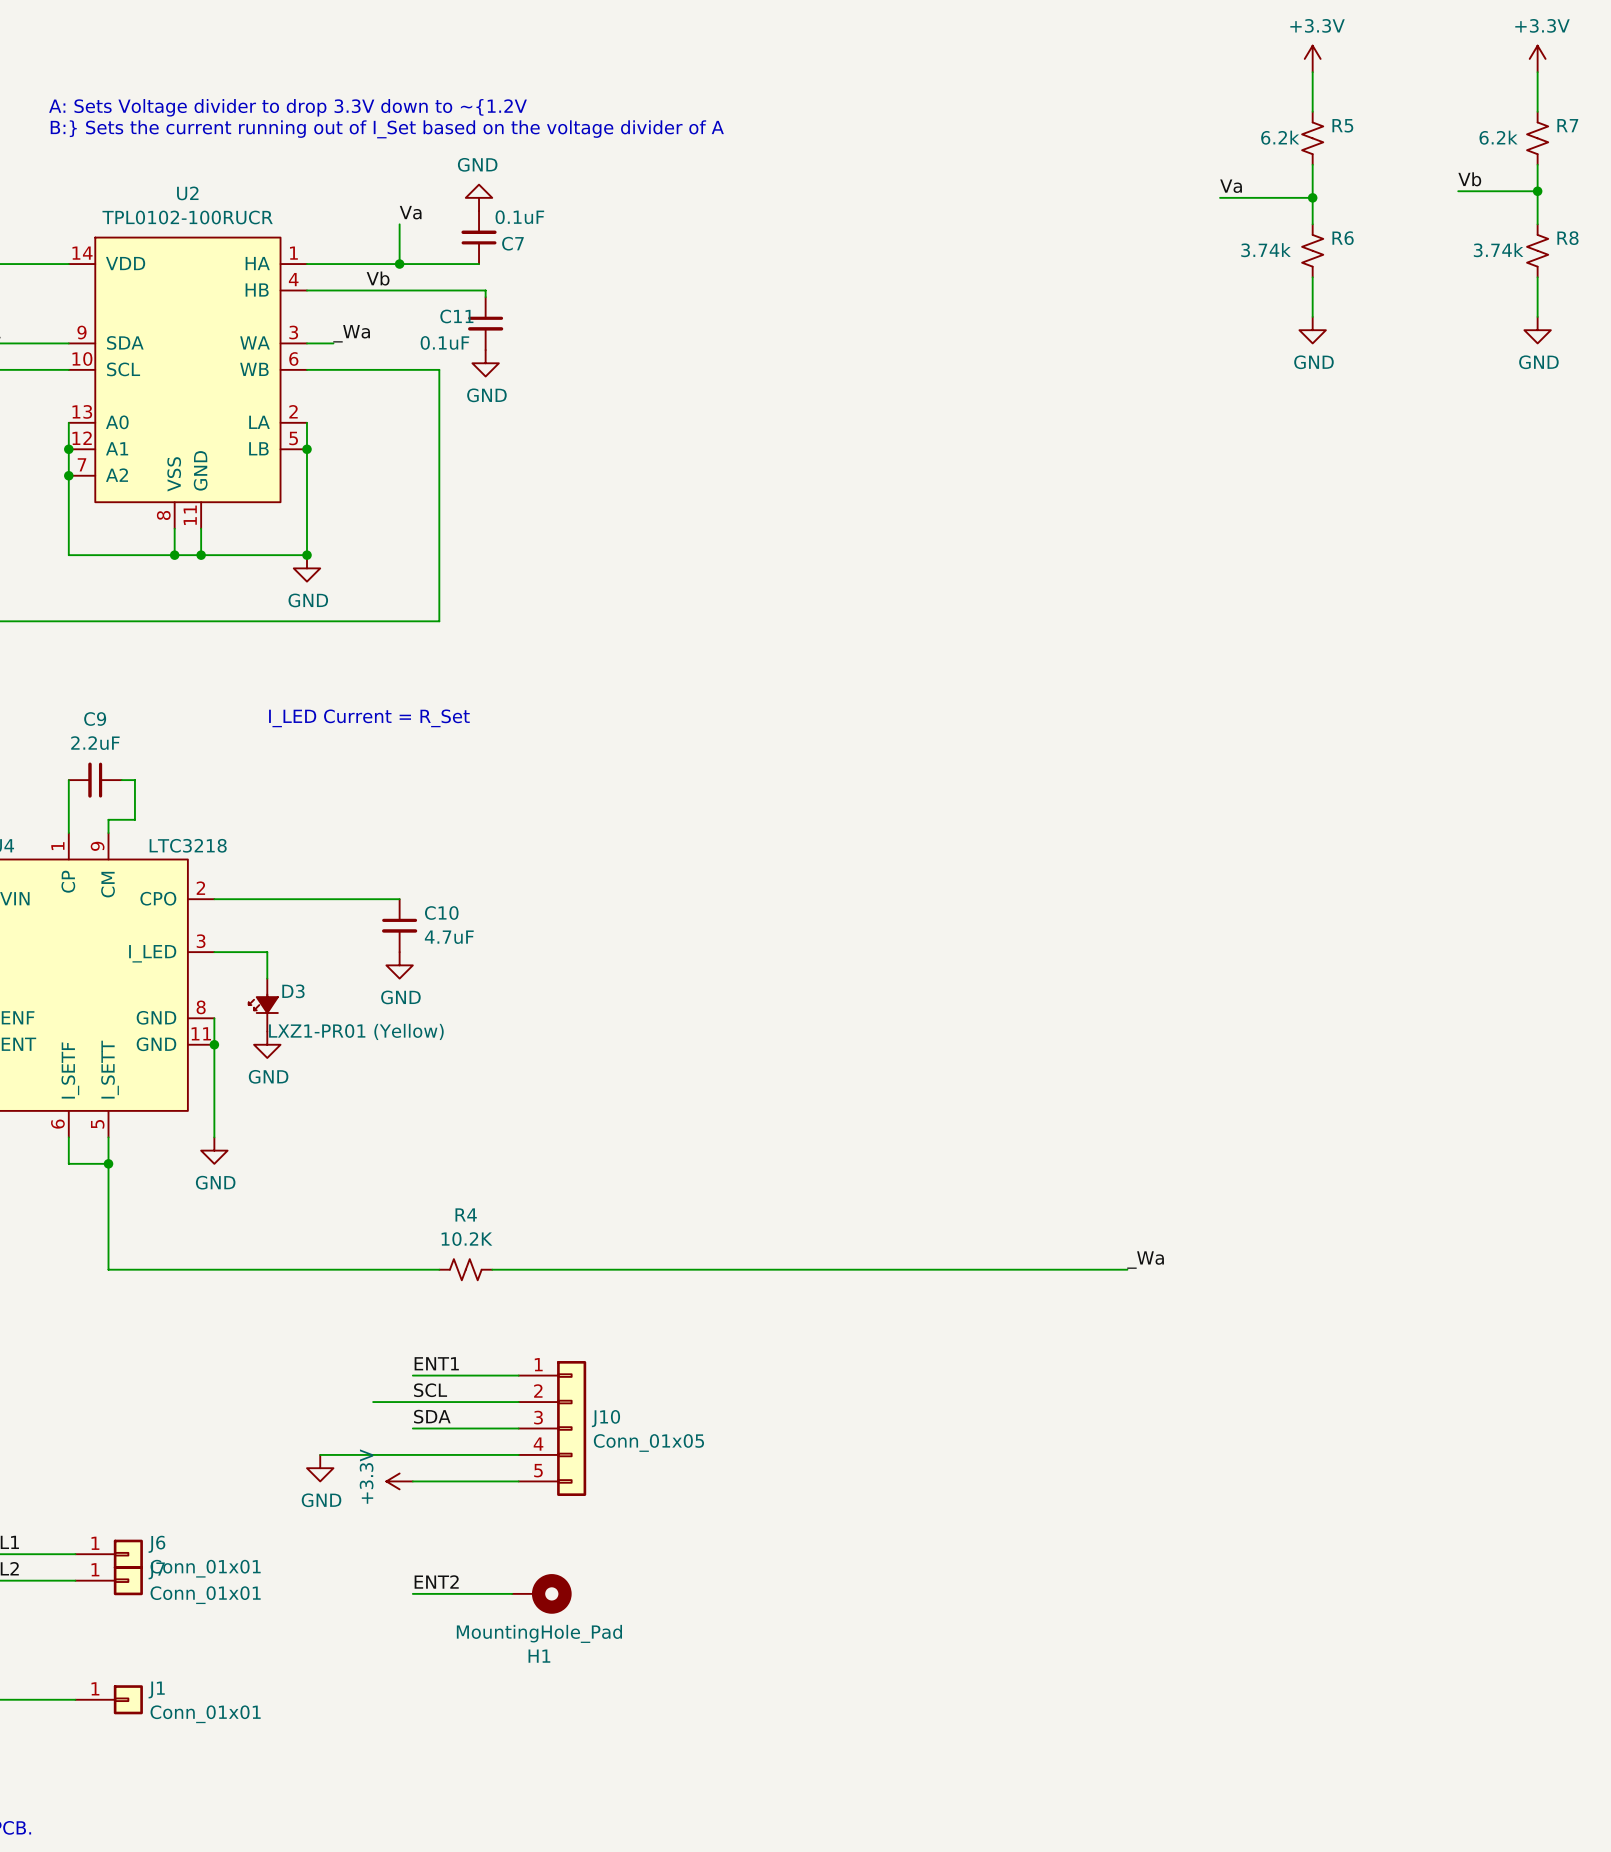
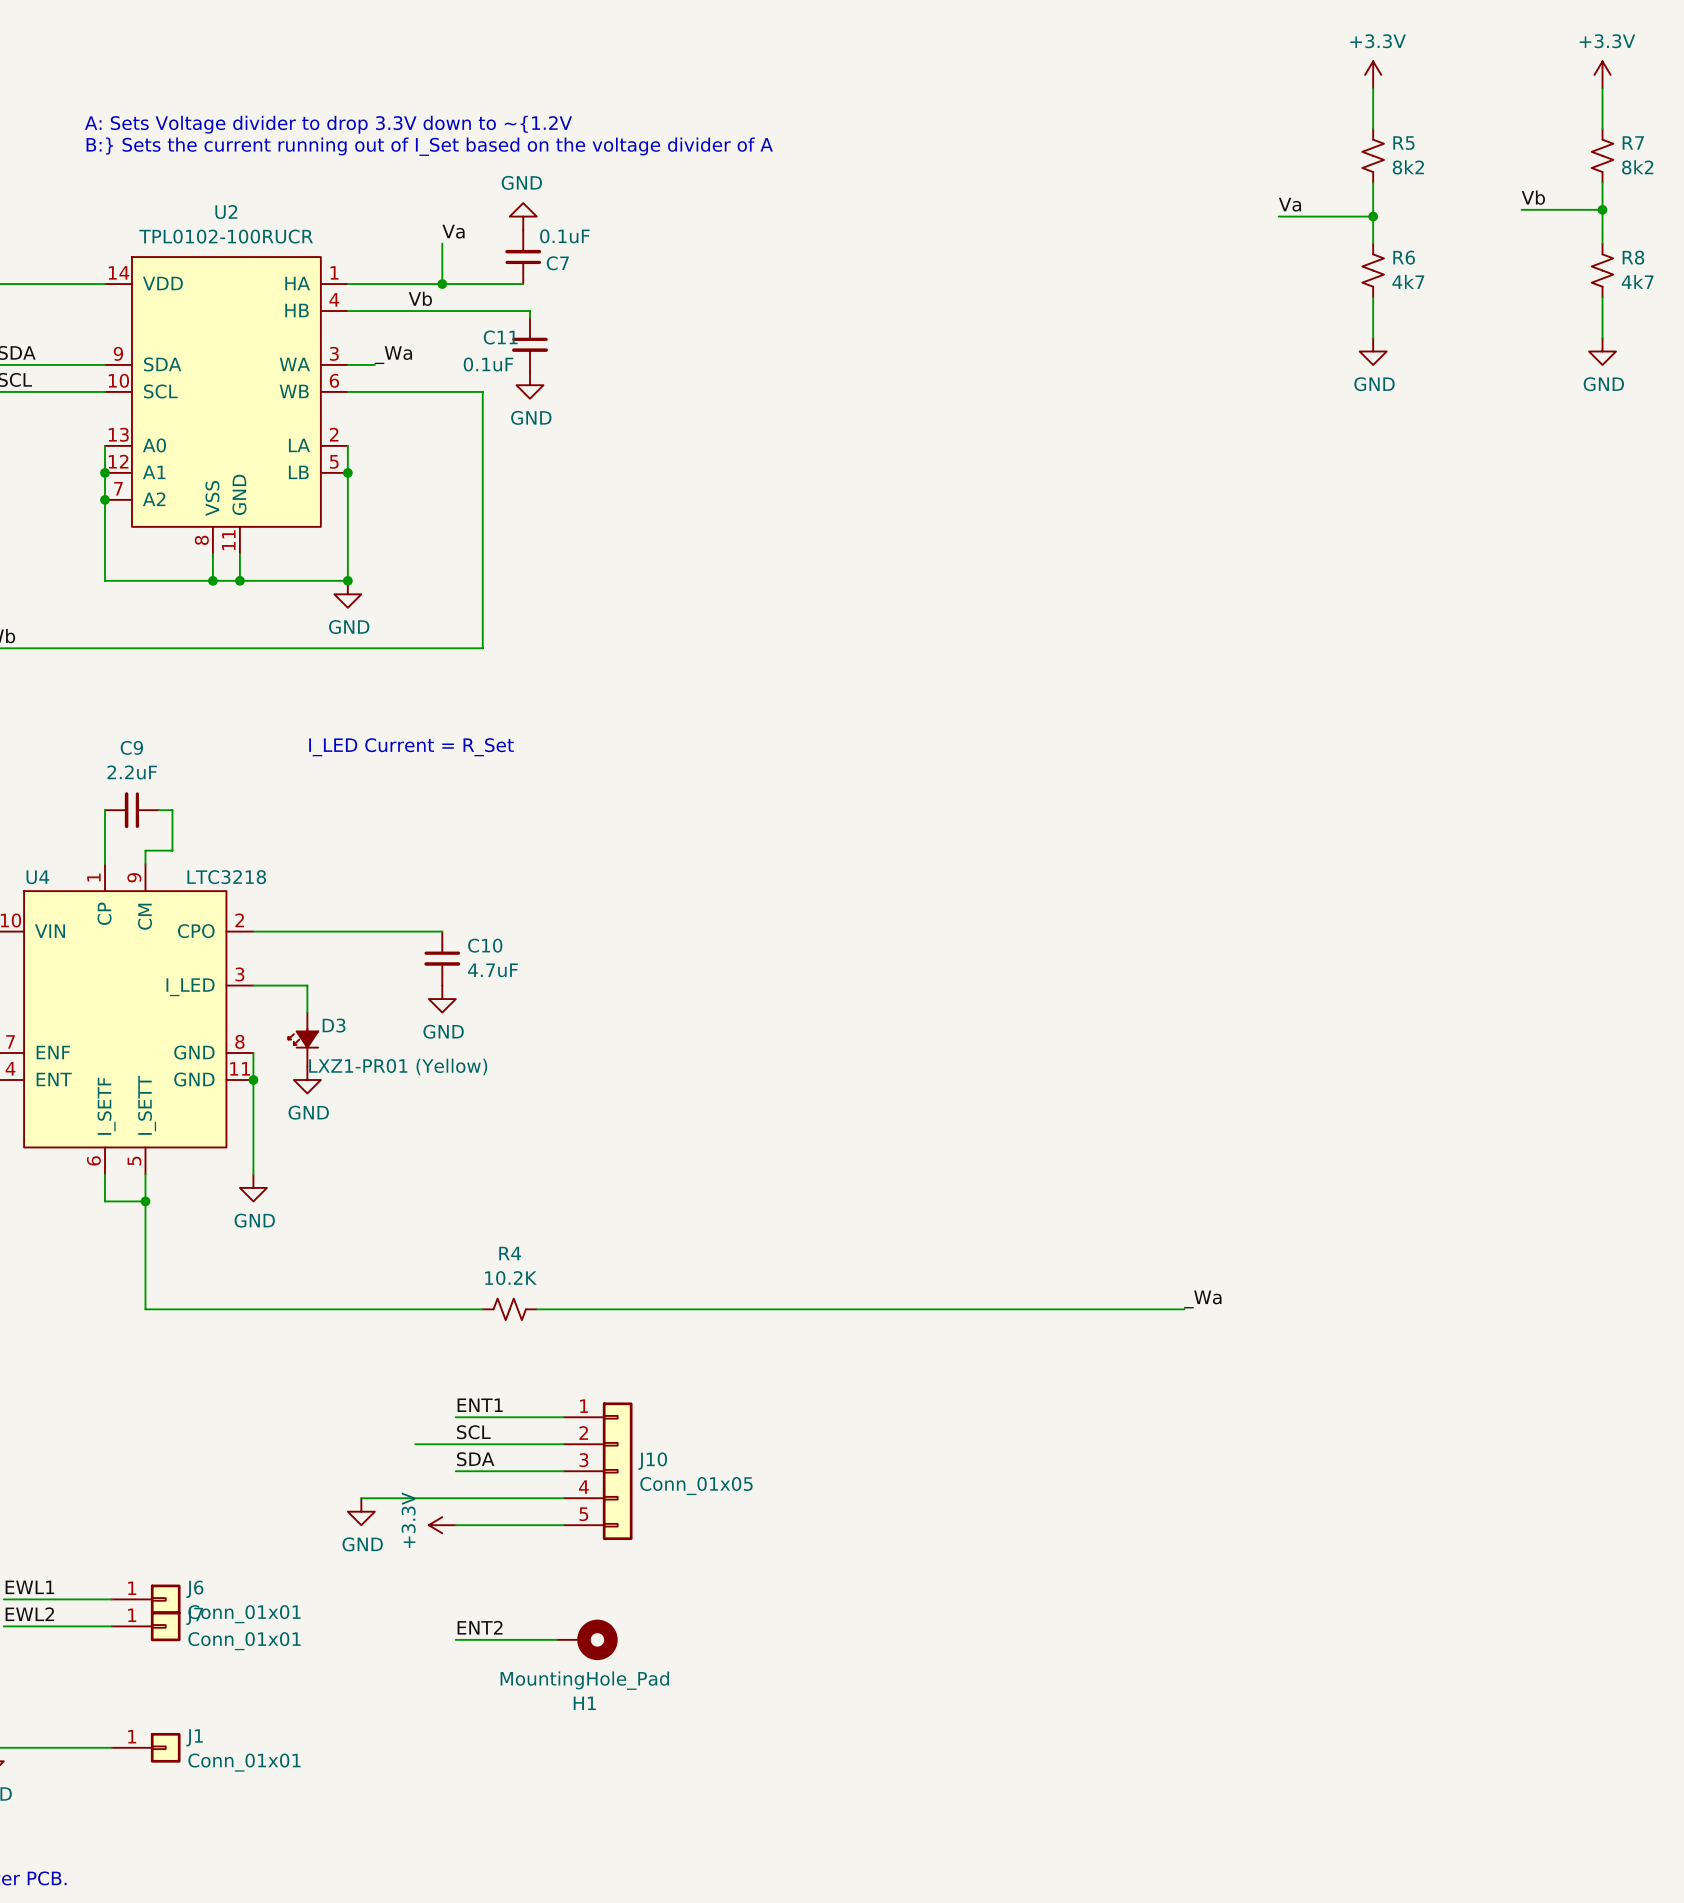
R5 text: 6.2k (1280, 137) -> none
R7 text: 6.2k (1498, 137) -> none
R5 value: none -> 8k2 (1408, 167)
R7 value: none -> 8k2 (1637, 167)
R6 text: 3.74k (1266, 250) -> none
R8 text: 3.74k (1498, 250) -> none
R6 value: none -> 4k7 (1408, 281)
R8 value: none -> 4k7 (1637, 281)

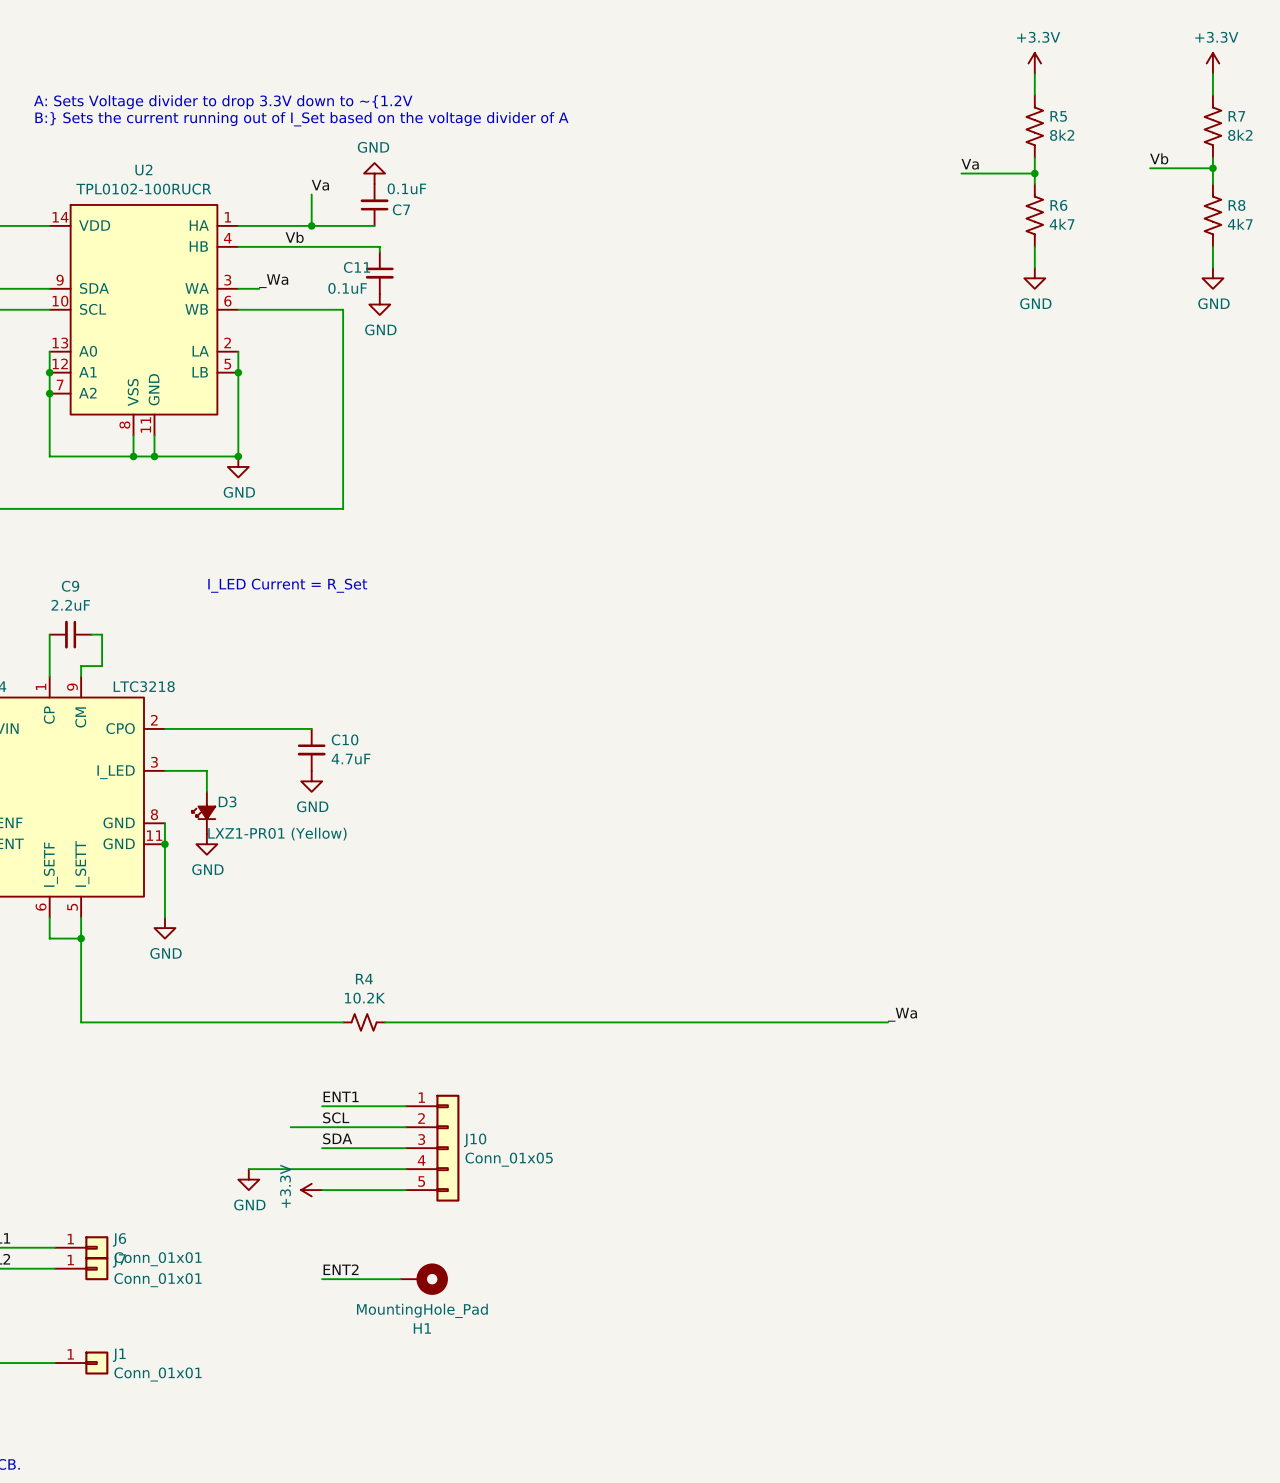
R5 symbol: [1362, 128, 1384, 183] -> [1026, 94, 1044, 158]
R7 symbol: [1591, 128, 1614, 183] -> [1204, 94, 1222, 158]
R6 symbol: [1362, 243, 1384, 298] -> [1026, 184, 1044, 247]
R8 symbol: [1591, 243, 1614, 298] -> [1204, 184, 1222, 247]

